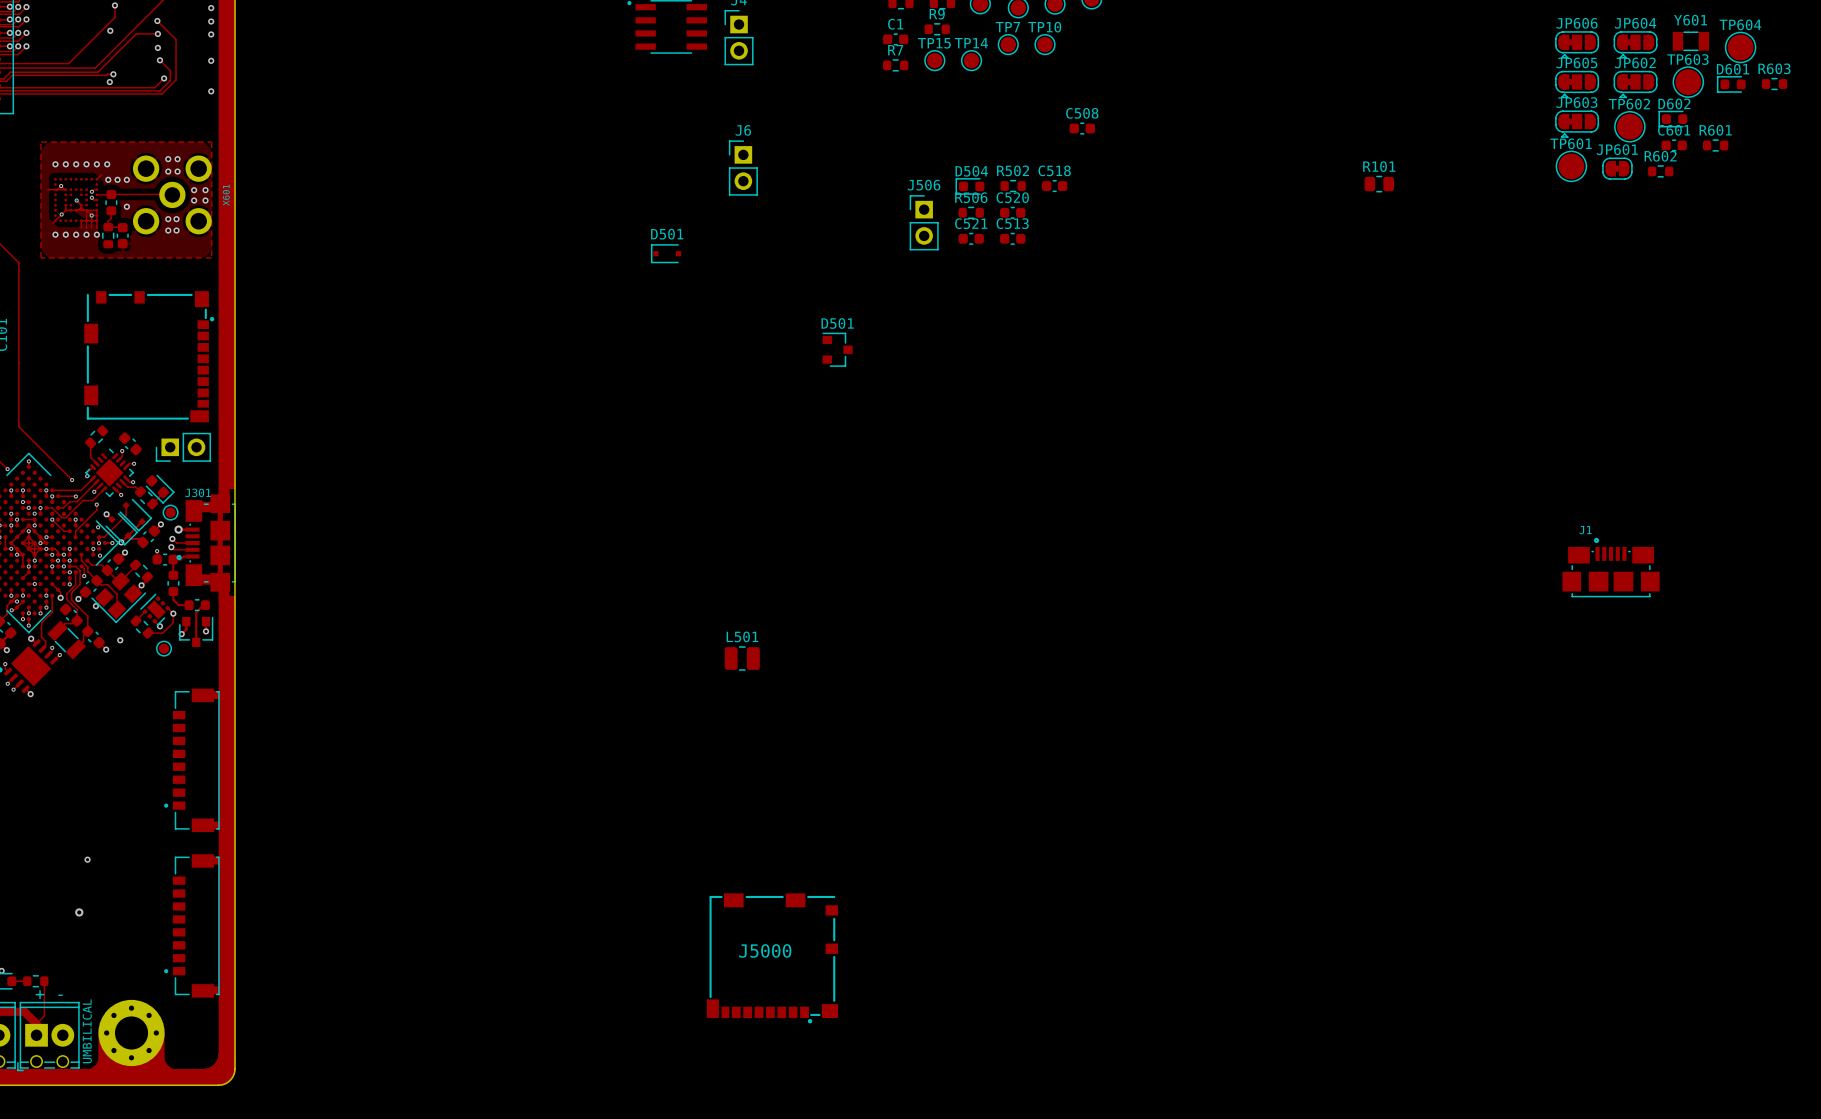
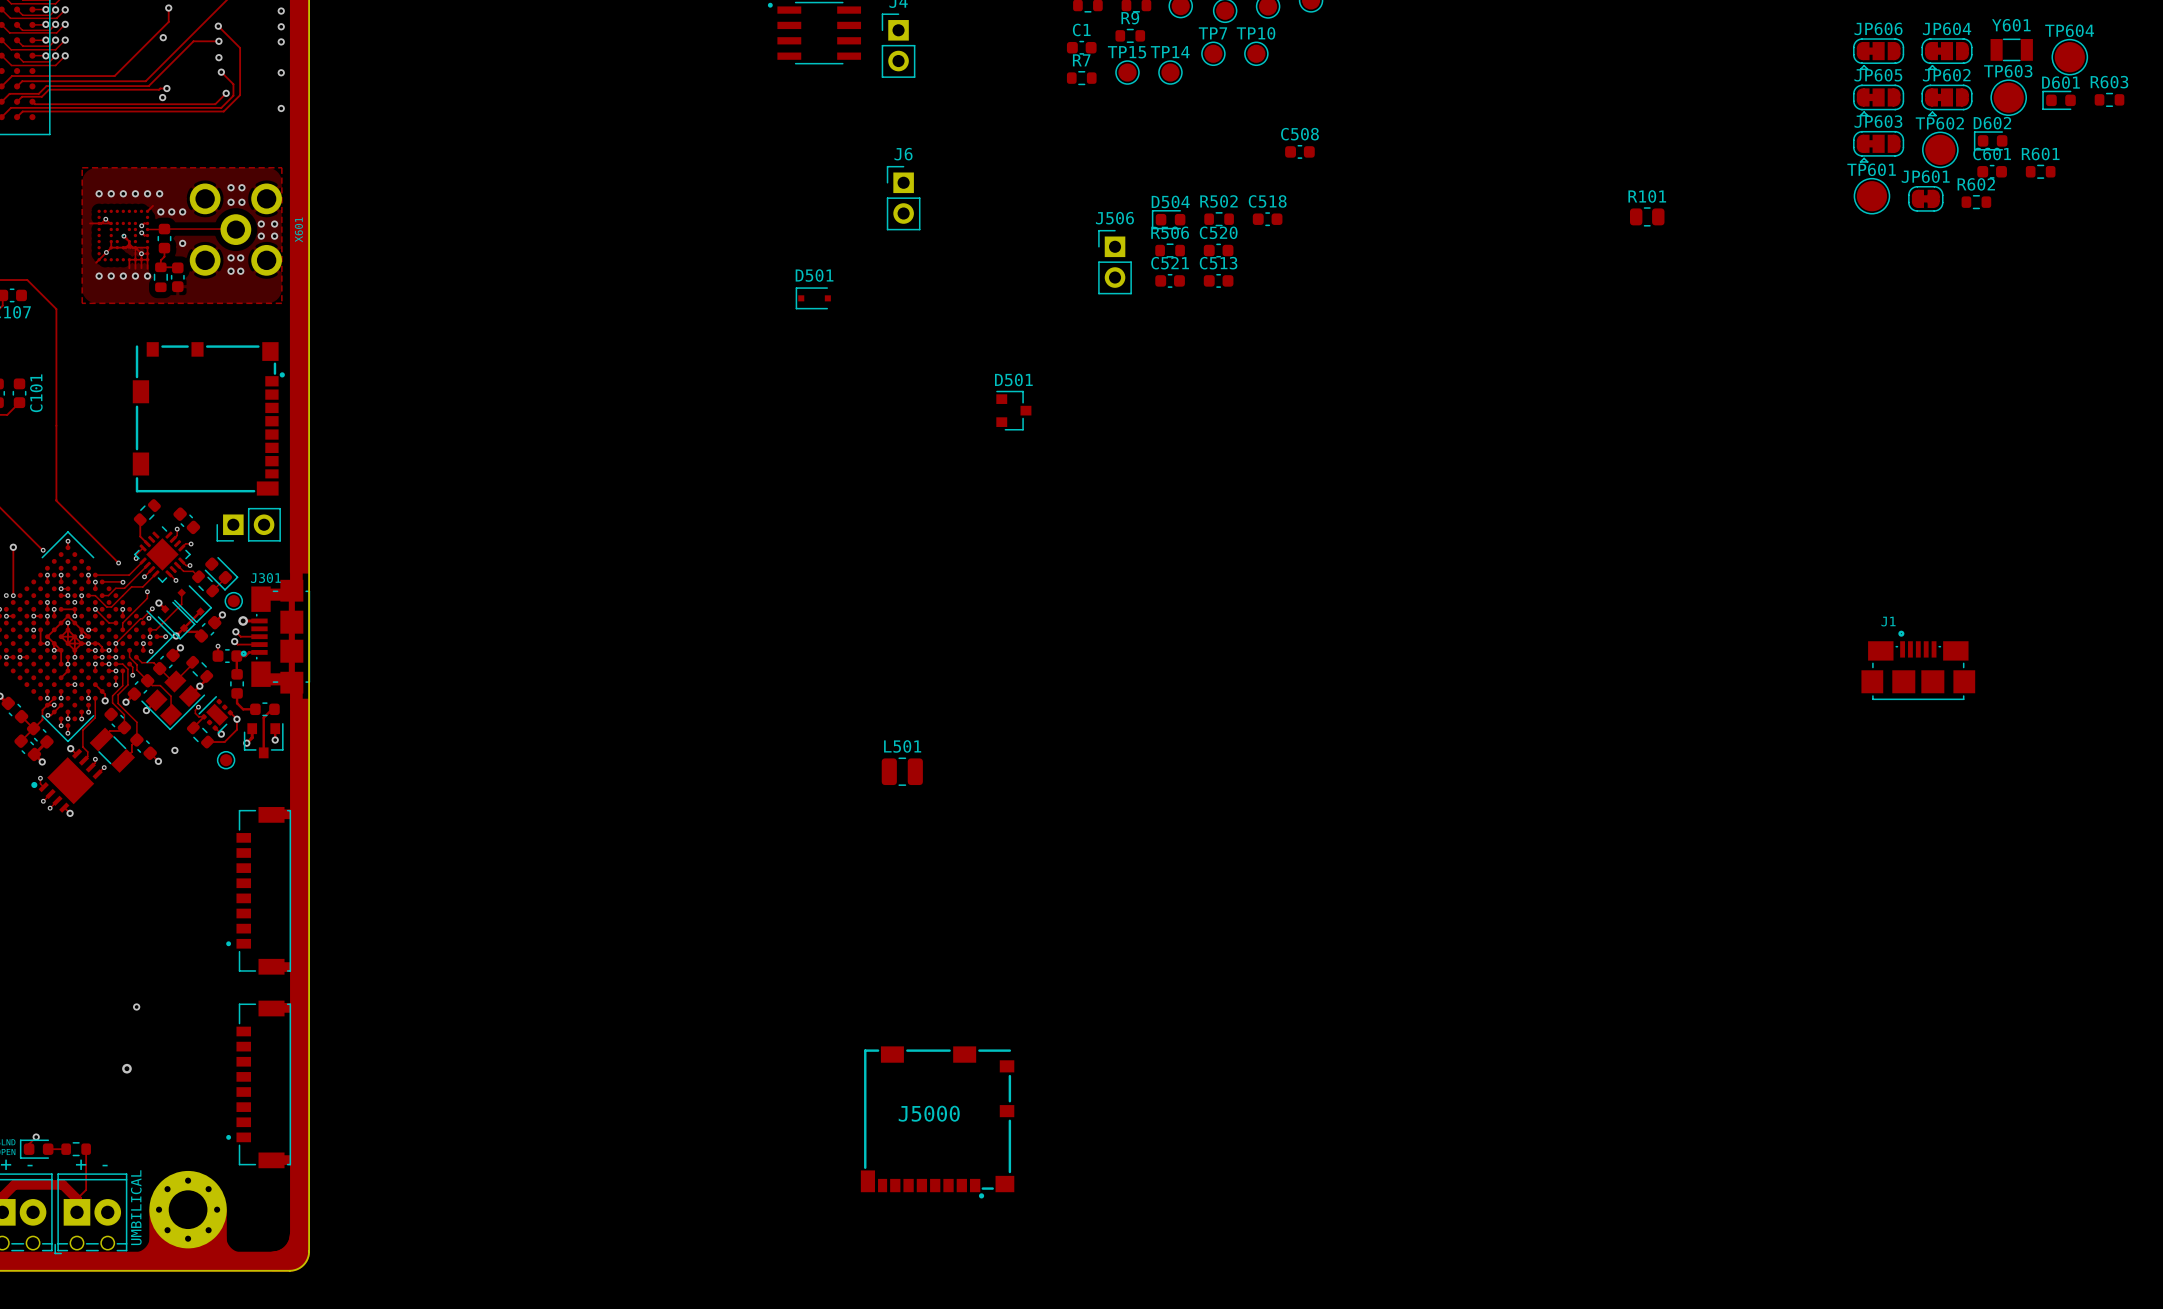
track: none -> (152, 608) (115, 643)
via: none -> (152, 608)
track: none -> (198, 707) (195, 713) (198, 716) (204, 716)
via: none -> (198, 707)

